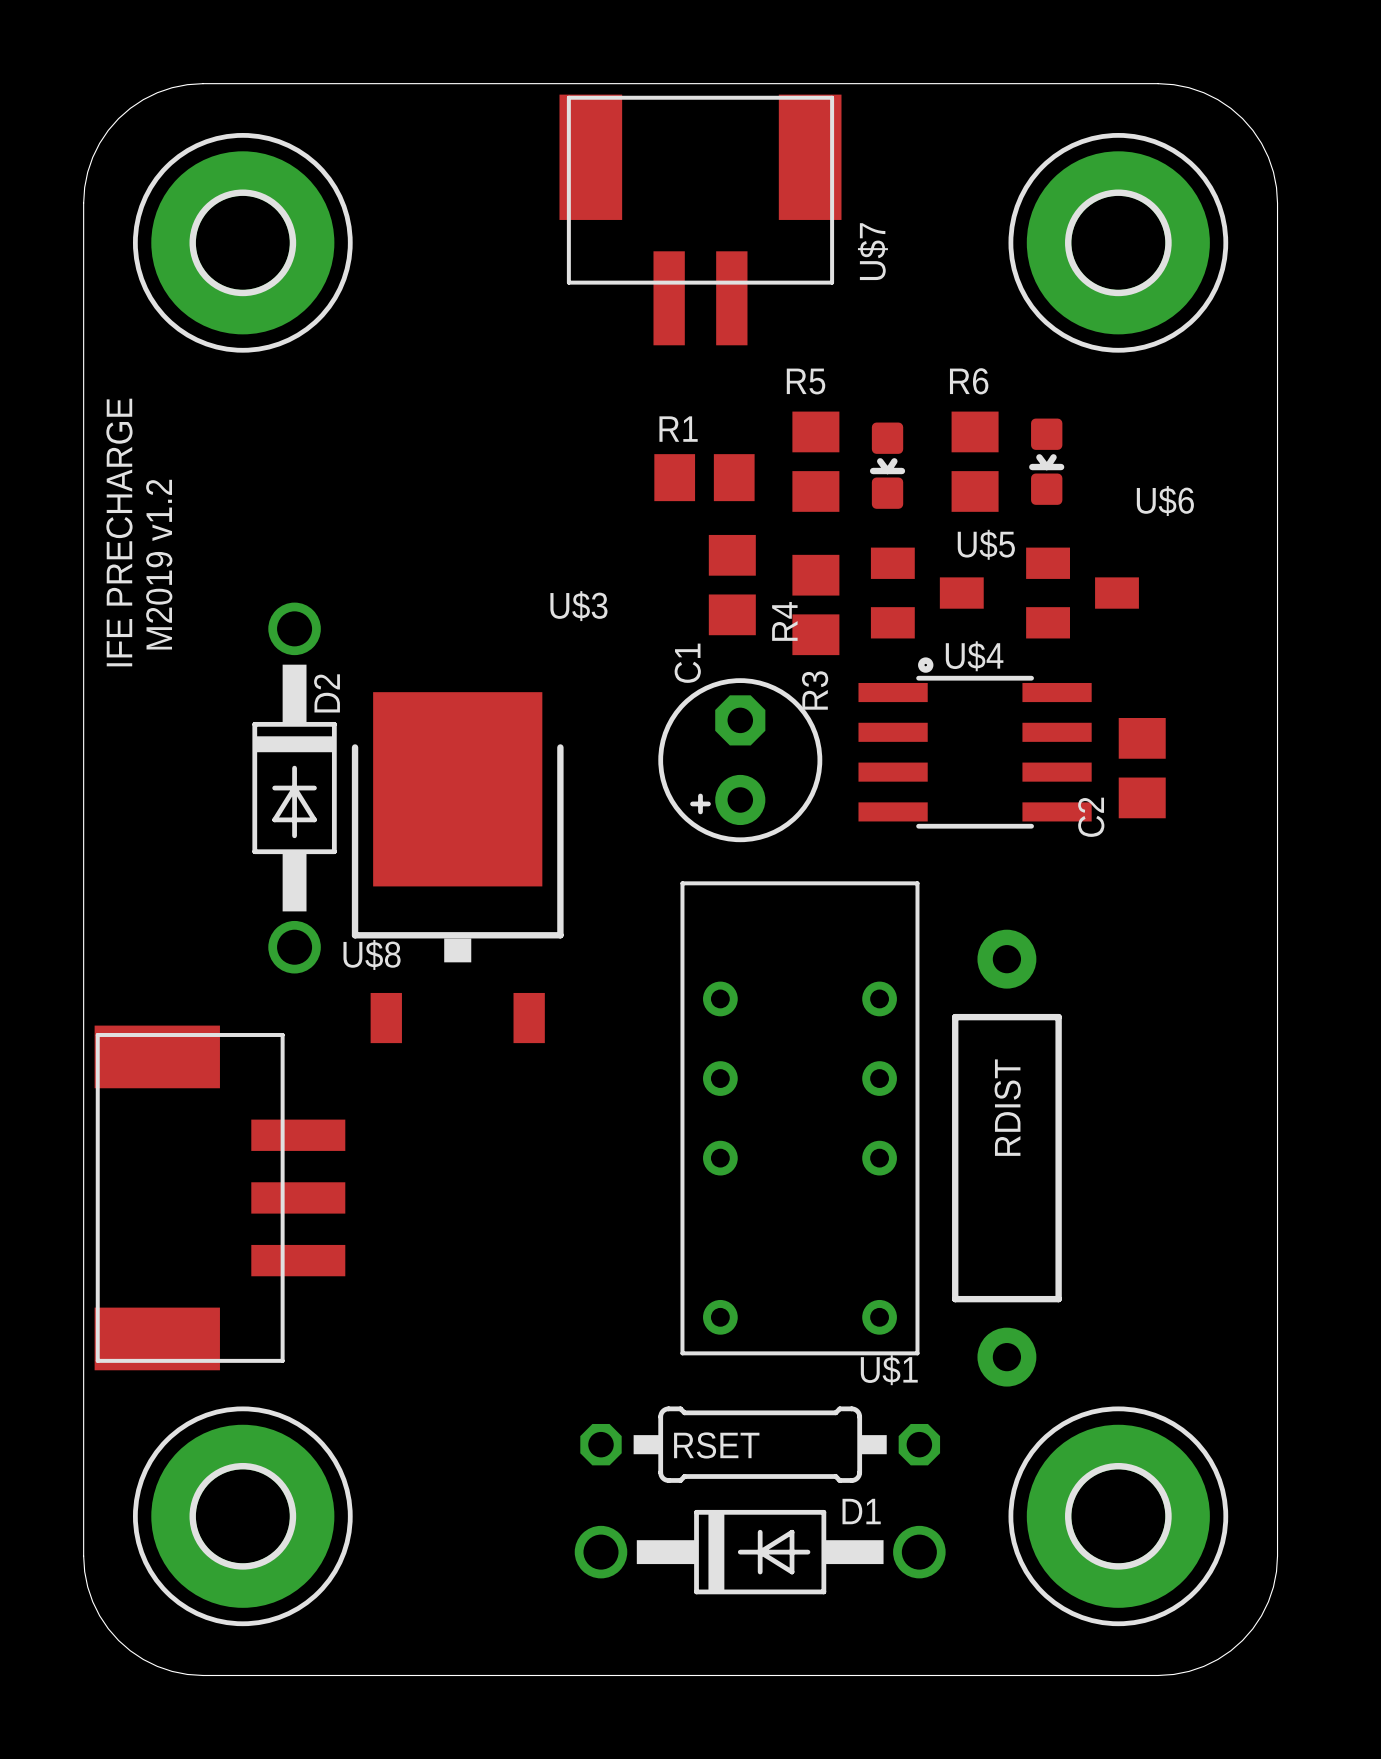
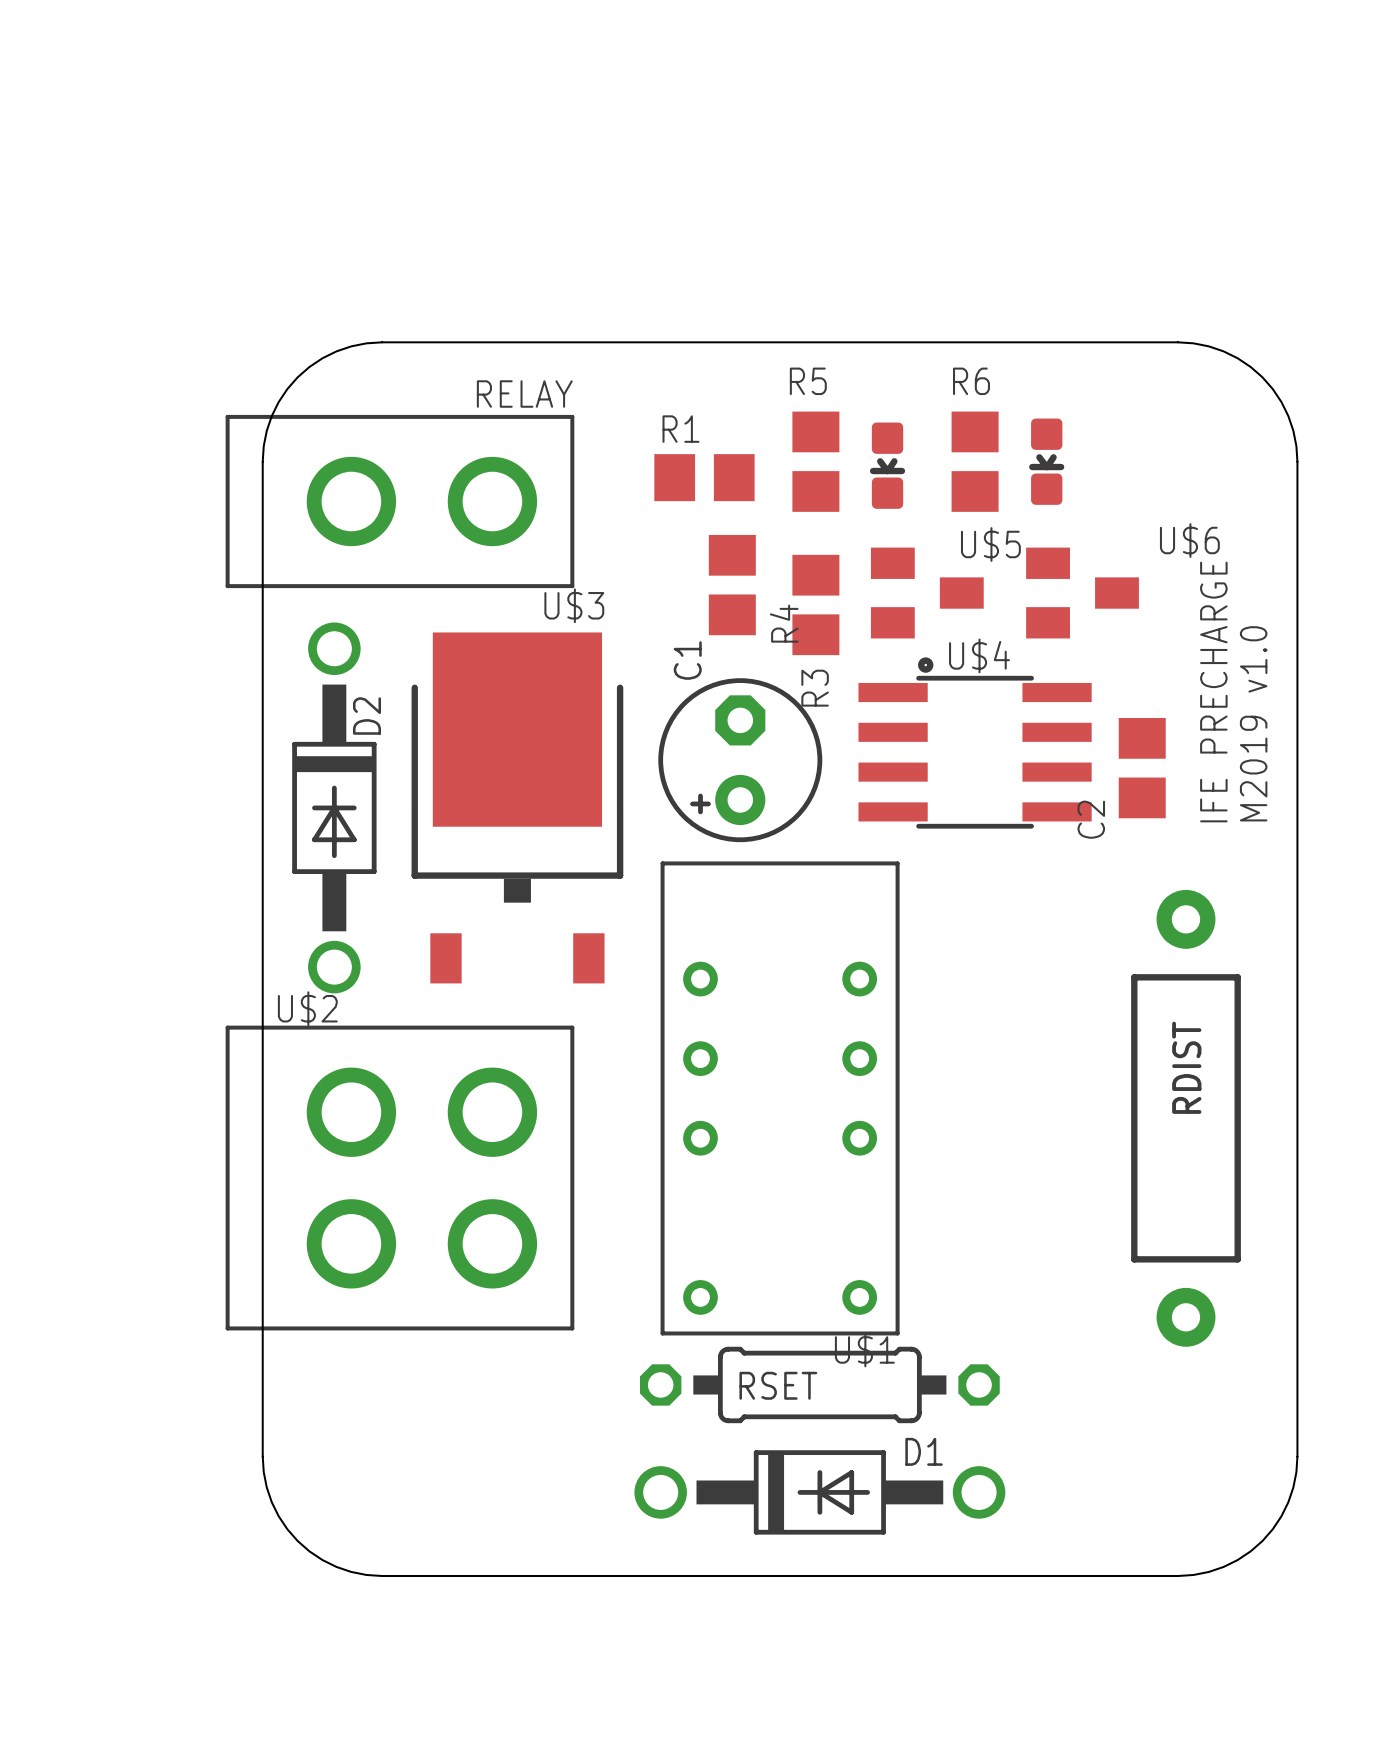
board edge: (203, 83) (1158, 83) (1189, 87) (1217, 99) (1242, 118) (1261, 143) (1273, 172) (1277, 203) (1277, 1556) (1273, 1587) (1261, 1615) (1242, 1640) (1217, 1659) (1189, 1671) (1158, 1675) (203, 1675) (172, 1671) (143, 1659) (118, 1640) (99, 1615) (87, 1587) (83, 1556) (84, 187) (87, 172) (99, 143) (118, 118) (143, 99) (157, 92) (172, 87) (203, 83) -> (382, 342) (351, 346) (336, 351) (322, 358) (297, 377) (278, 402) (266, 430) (263, 446) (262, 1456) (266, 1487) (278, 1516) (287, 1529) (297, 1541) (322, 1560) (351, 1571) (382, 1576) (1178, 1576) (1208, 1571) (1237, 1560) (1250, 1551) (1262, 1541) (1281, 1516) (1293, 1487) (1297, 1456) (1297, 461) (1293, 430) (1281, 402) (1272, 389) (1262, 377) (1237, 358) (1208, 346) (1178, 342) (382, 342)
U$7: (700, 219) -> none
part: (242, 242) -> none
part: (1118, 242) -> none
RELAY: none -> (399, 501)
U$6 name position: U$6 (1165, 501) -> U$6 (1189, 540)
text: IFE PRECHARGE (119, 532) -> none
text: M2019 v1.2 (159, 564) -> none
text: none -> IFE PRECHARGE (1213, 691)
text: none -> M2019 v1.0 (1253, 723)
D2 position: (294, 788) -> (334, 807)
U$3 position: (457, 867) -> (517, 807)
U$1 position: (799, 1118) -> (780, 1098)
RDIST position: (1006, 1158) -> (1186, 1118)
U$2: none -> (399, 1178)
U$8: (219, 1197) -> none
RSET position: (760, 1444) -> (819, 1384)
part: (242, 1516) -> none
part: (1118, 1516) -> none
D1 position: (760, 1552) -> (819, 1492)

